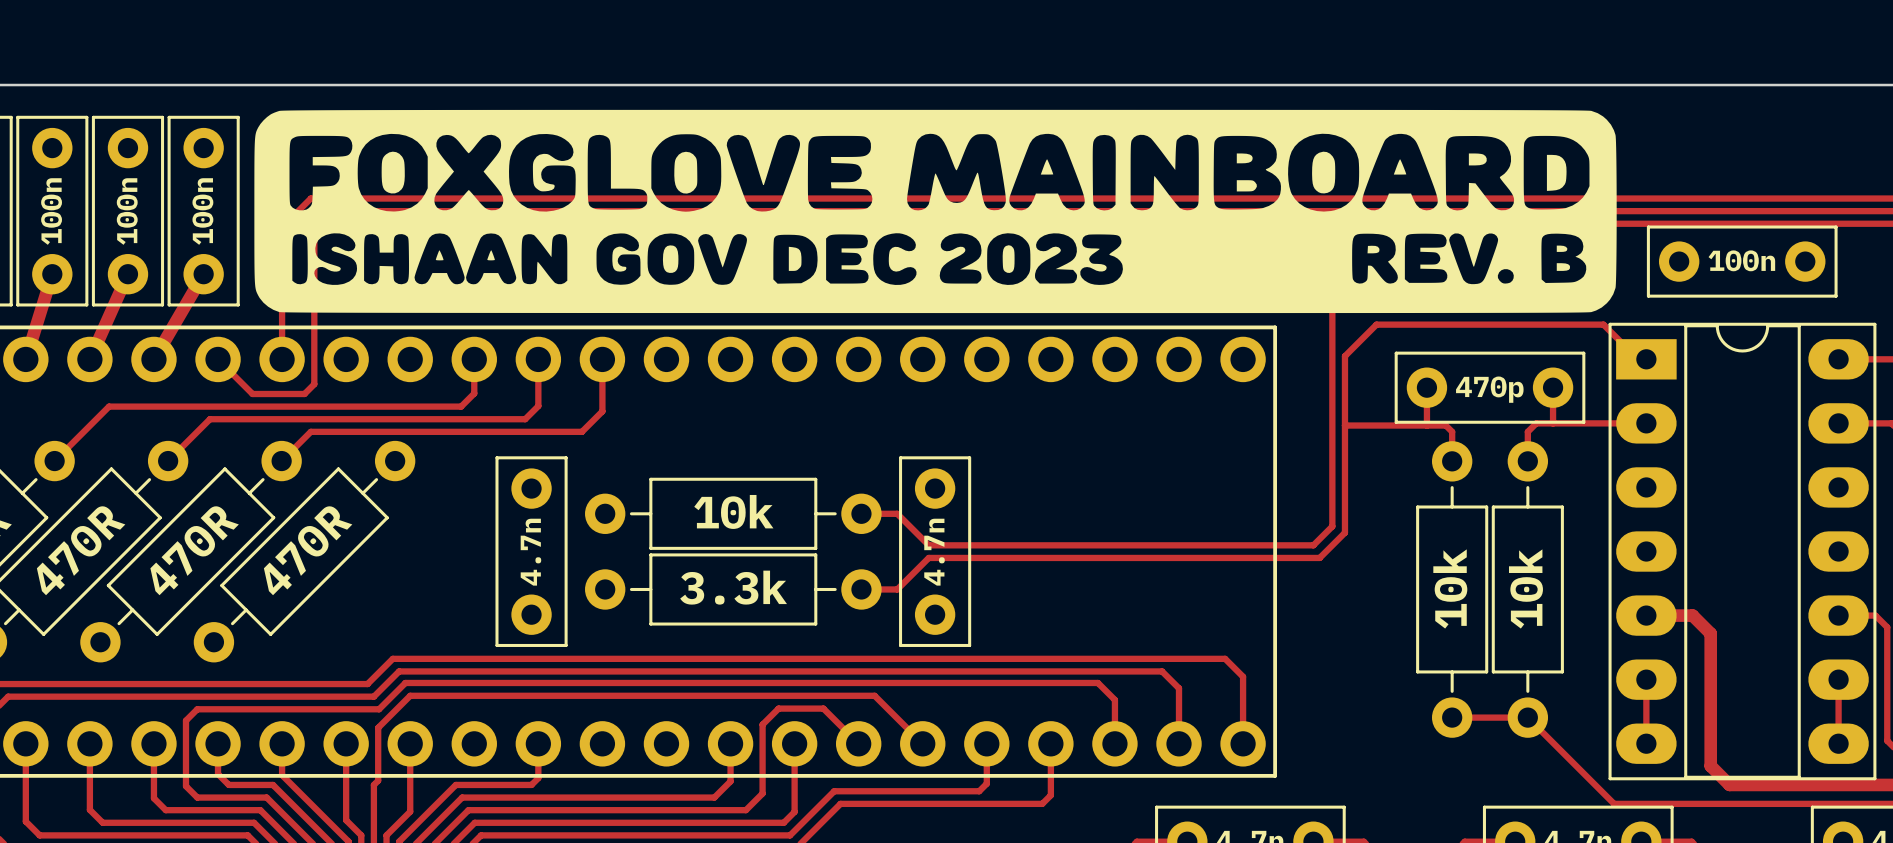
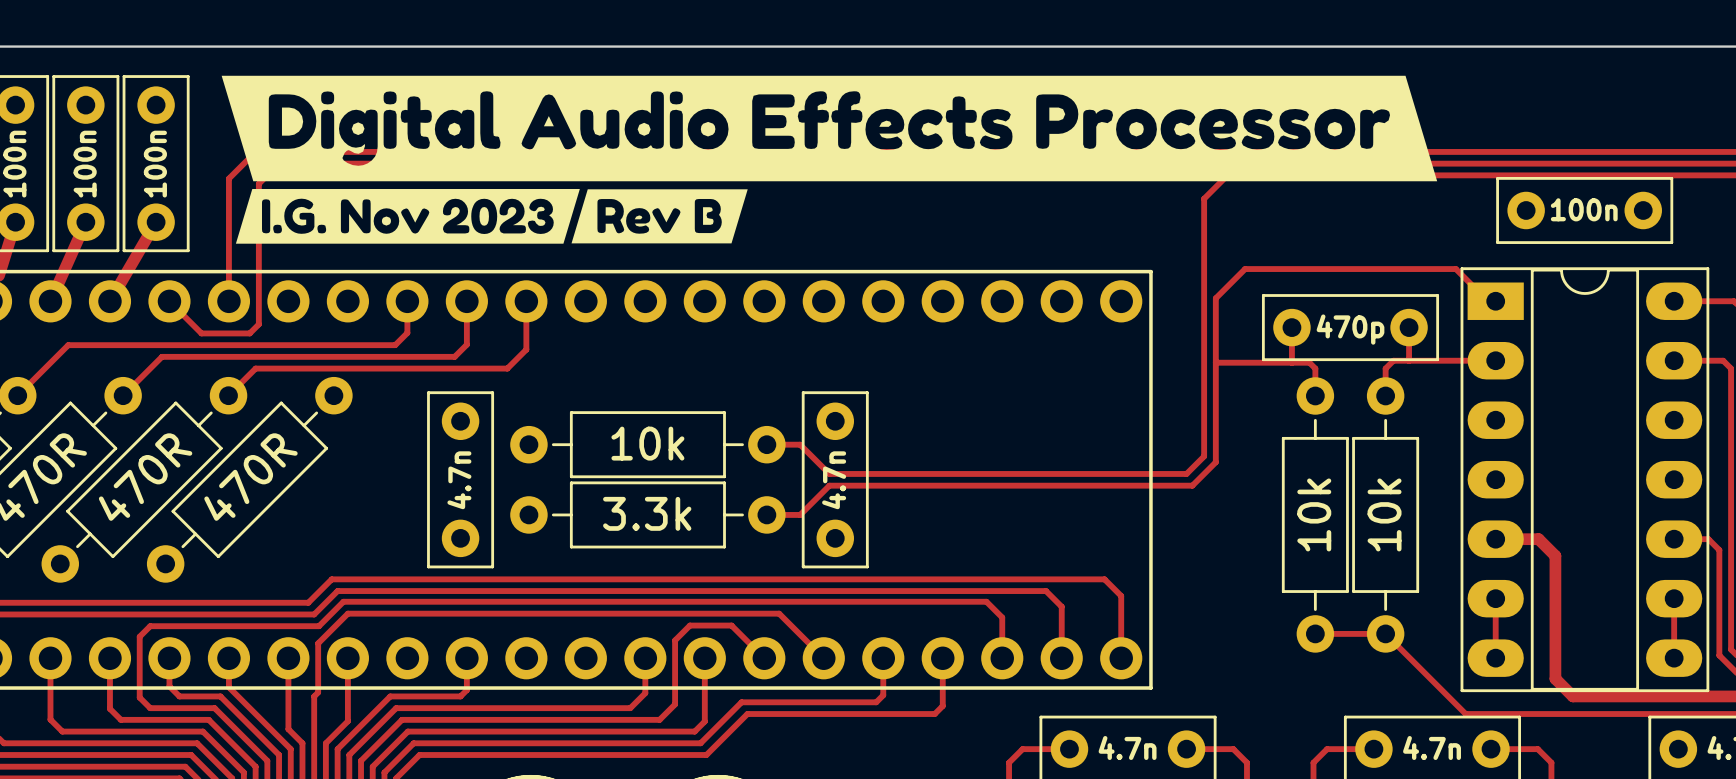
drawing: [254, 109, 1617, 314] -> none
drawing: none -> [221, 75, 1438, 244]

